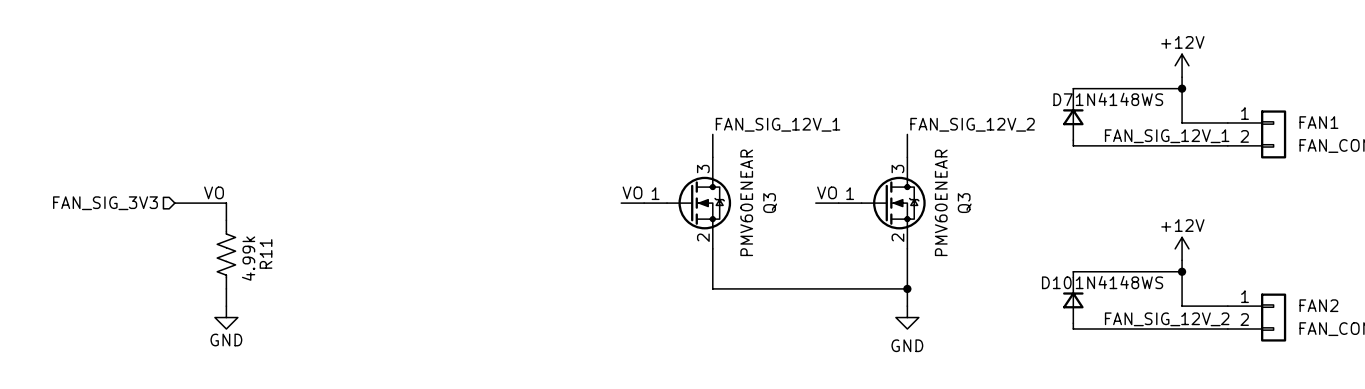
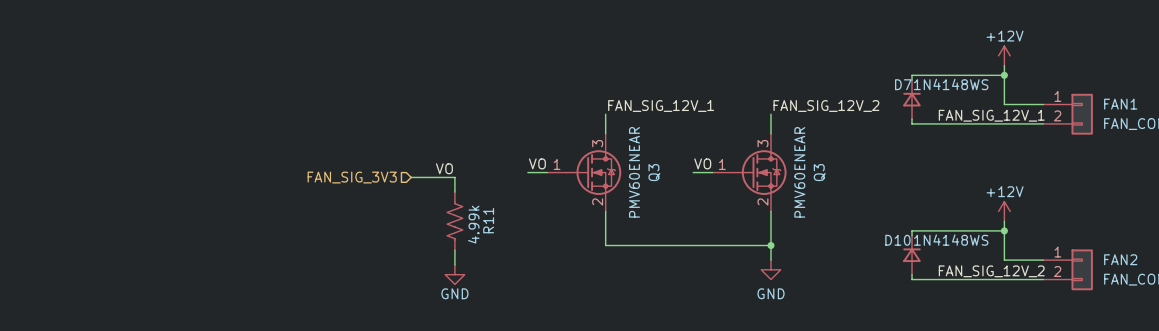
label: VO (214, 192) -> none
label: none -> VO (444, 168)
hierarchical label: FAN_SIG_3V3 (105, 203) -> none
wire: (174, 203) (226, 203) (226, 220) -> none
hierarchical label: none -> FAN_SIG_3V3 (352, 177)
wire: none -> (411, 177) (454, 177) (454, 192)
R11 position: (226, 254) -> (454, 221)
wire: (226, 288) (226, 306) -> none
wire: none -> (454, 250) (454, 264)
power symbol: GND (226, 317) -> none
power symbol: none -> GND (454, 274)

